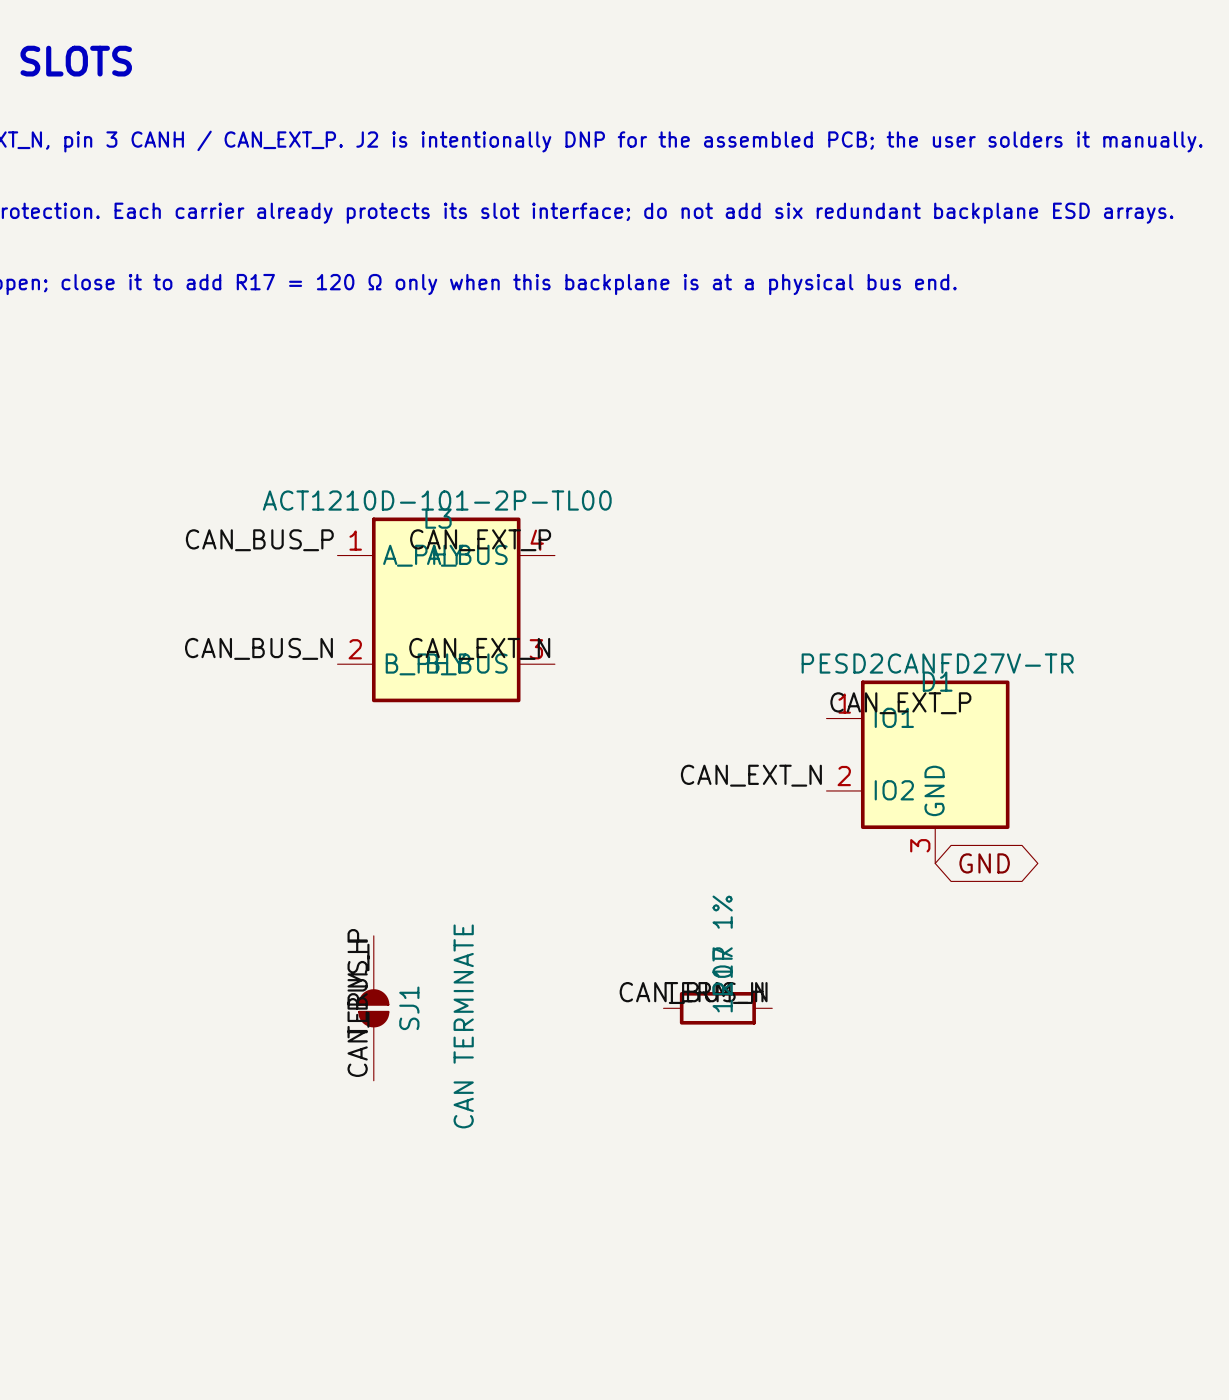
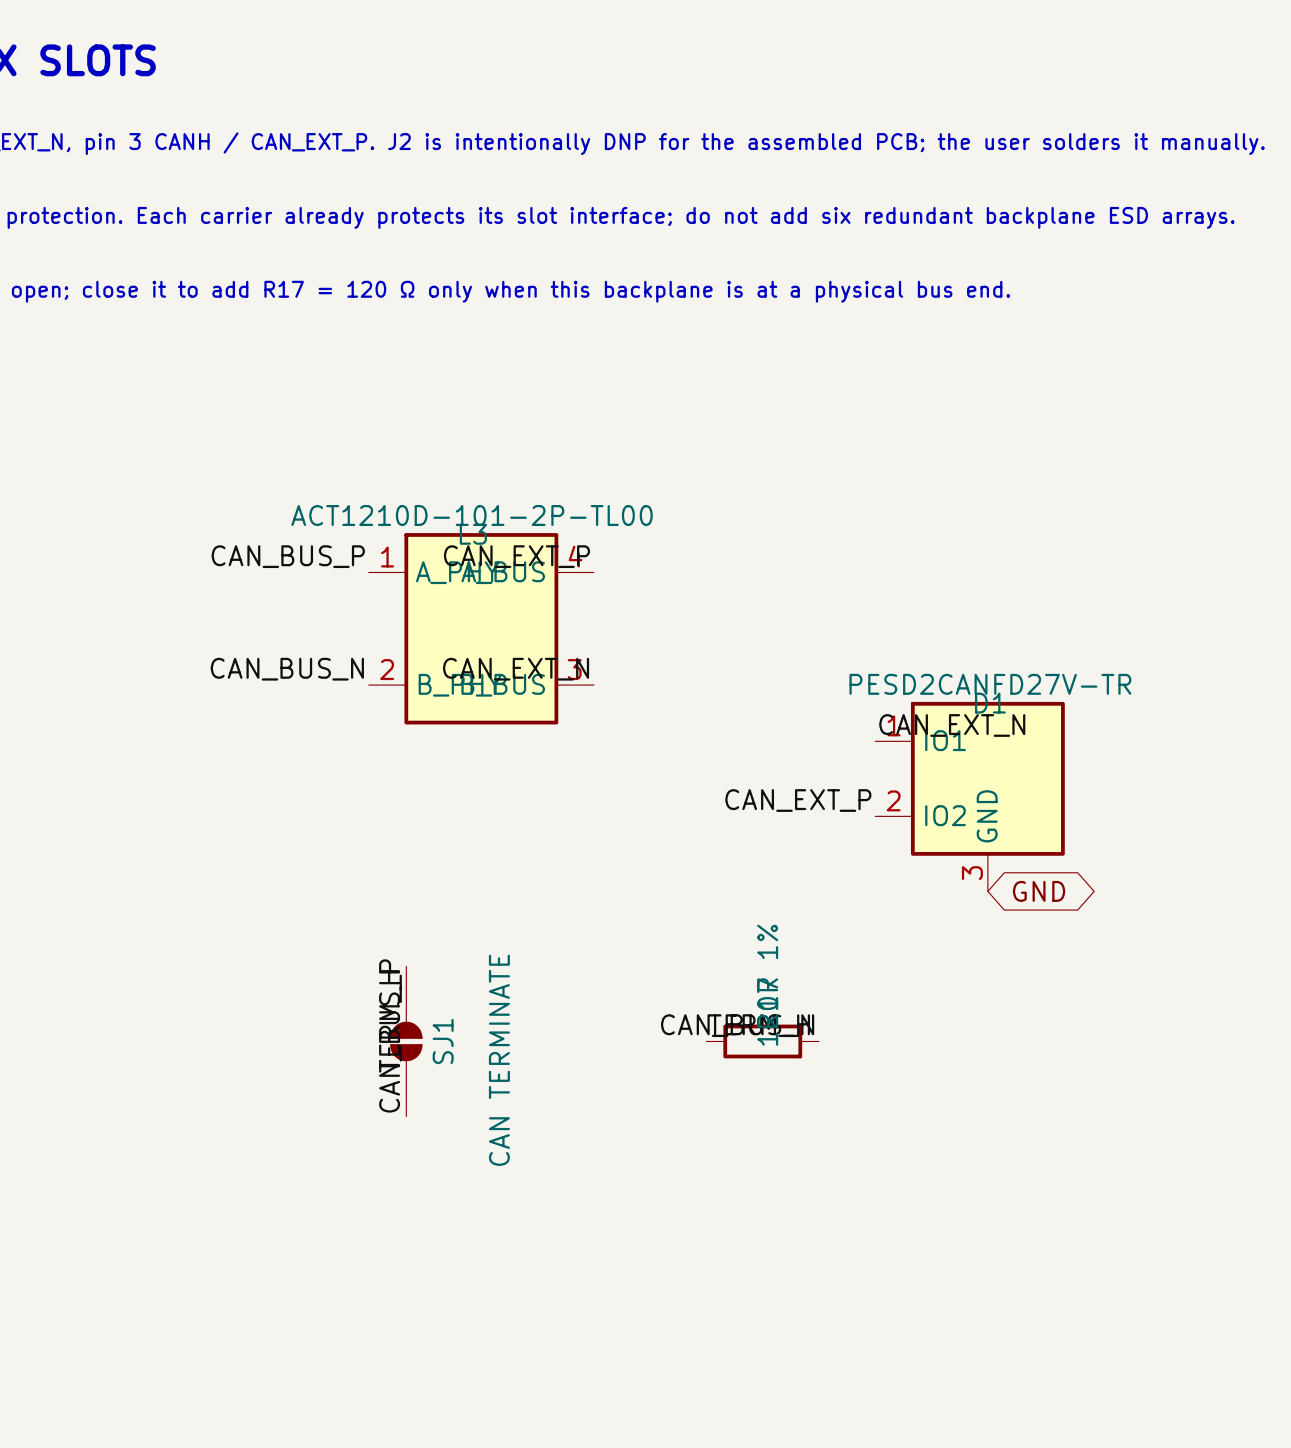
label: CAN_EXT_P (900, 703) -> CAN_EXT_N (952, 725)
label: CAN_EXT_N (751, 775) -> CAN_EXT_P (798, 800)

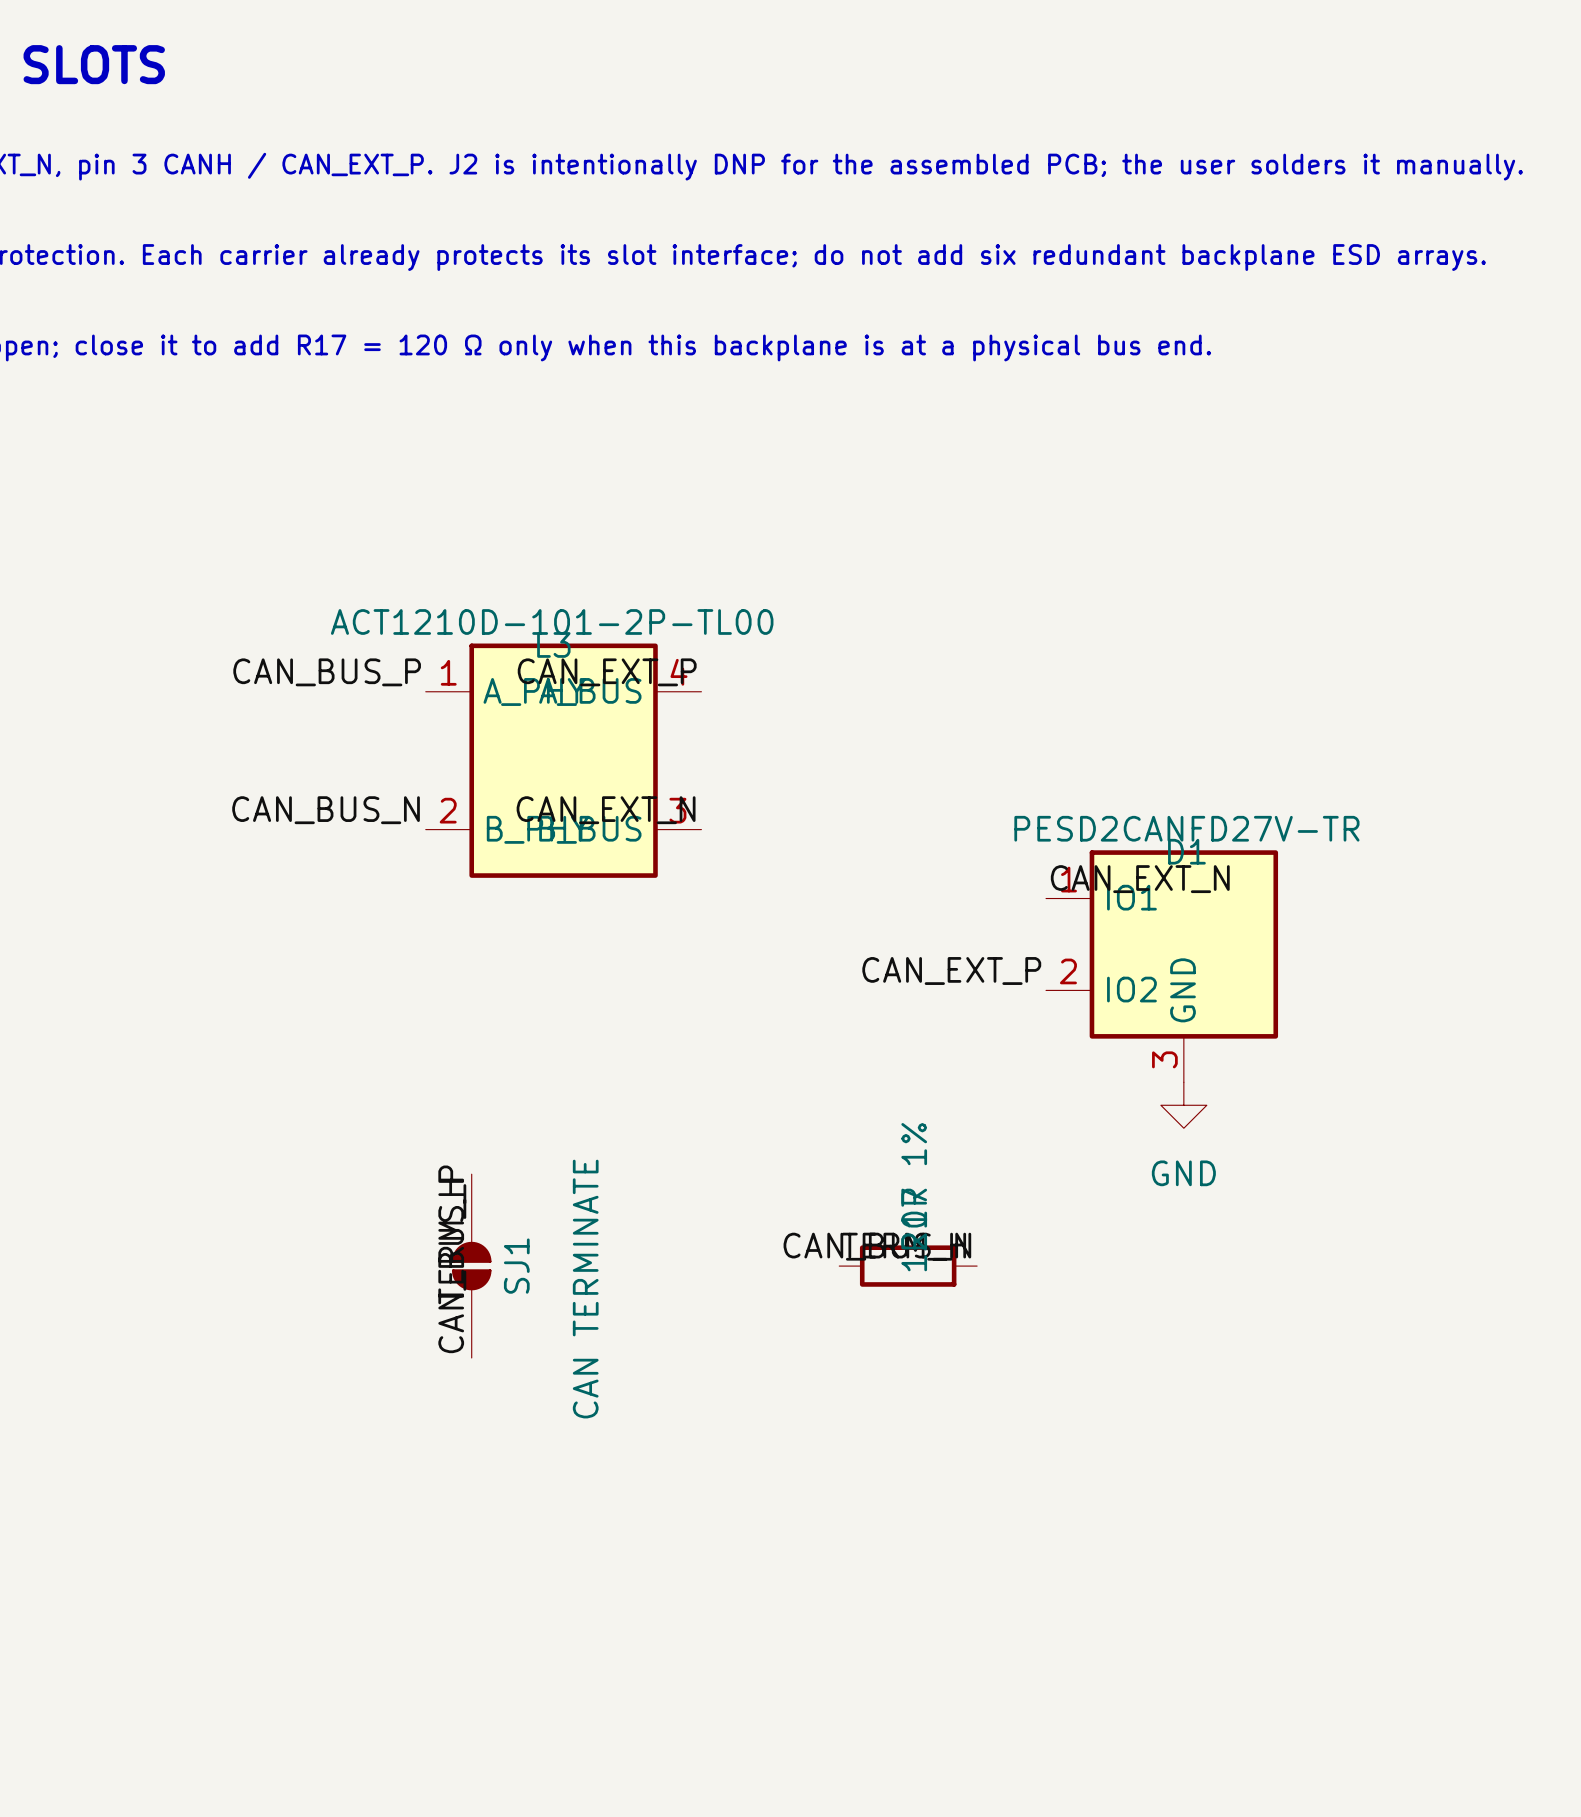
global label: GND (1039, 891) -> none
power symbol: none -> GND (1183, 1105)

